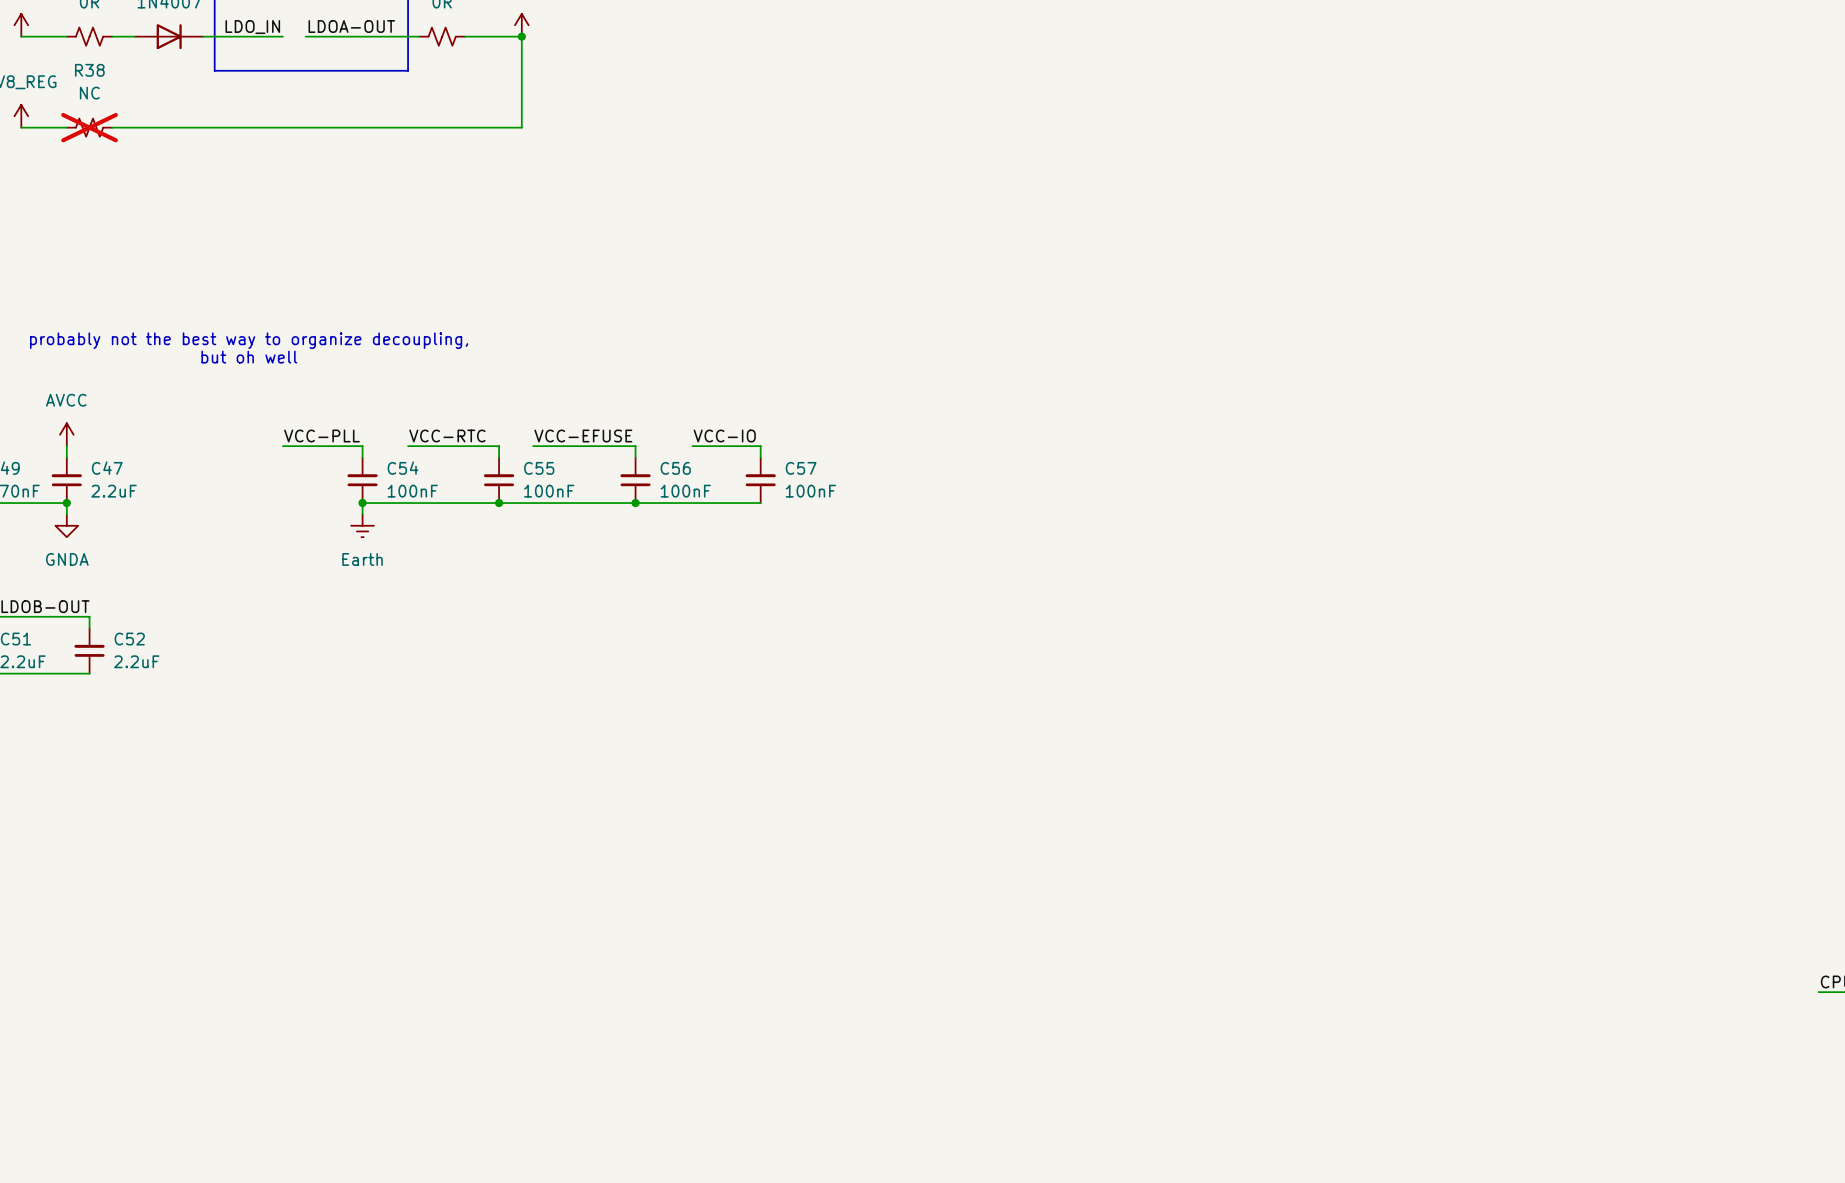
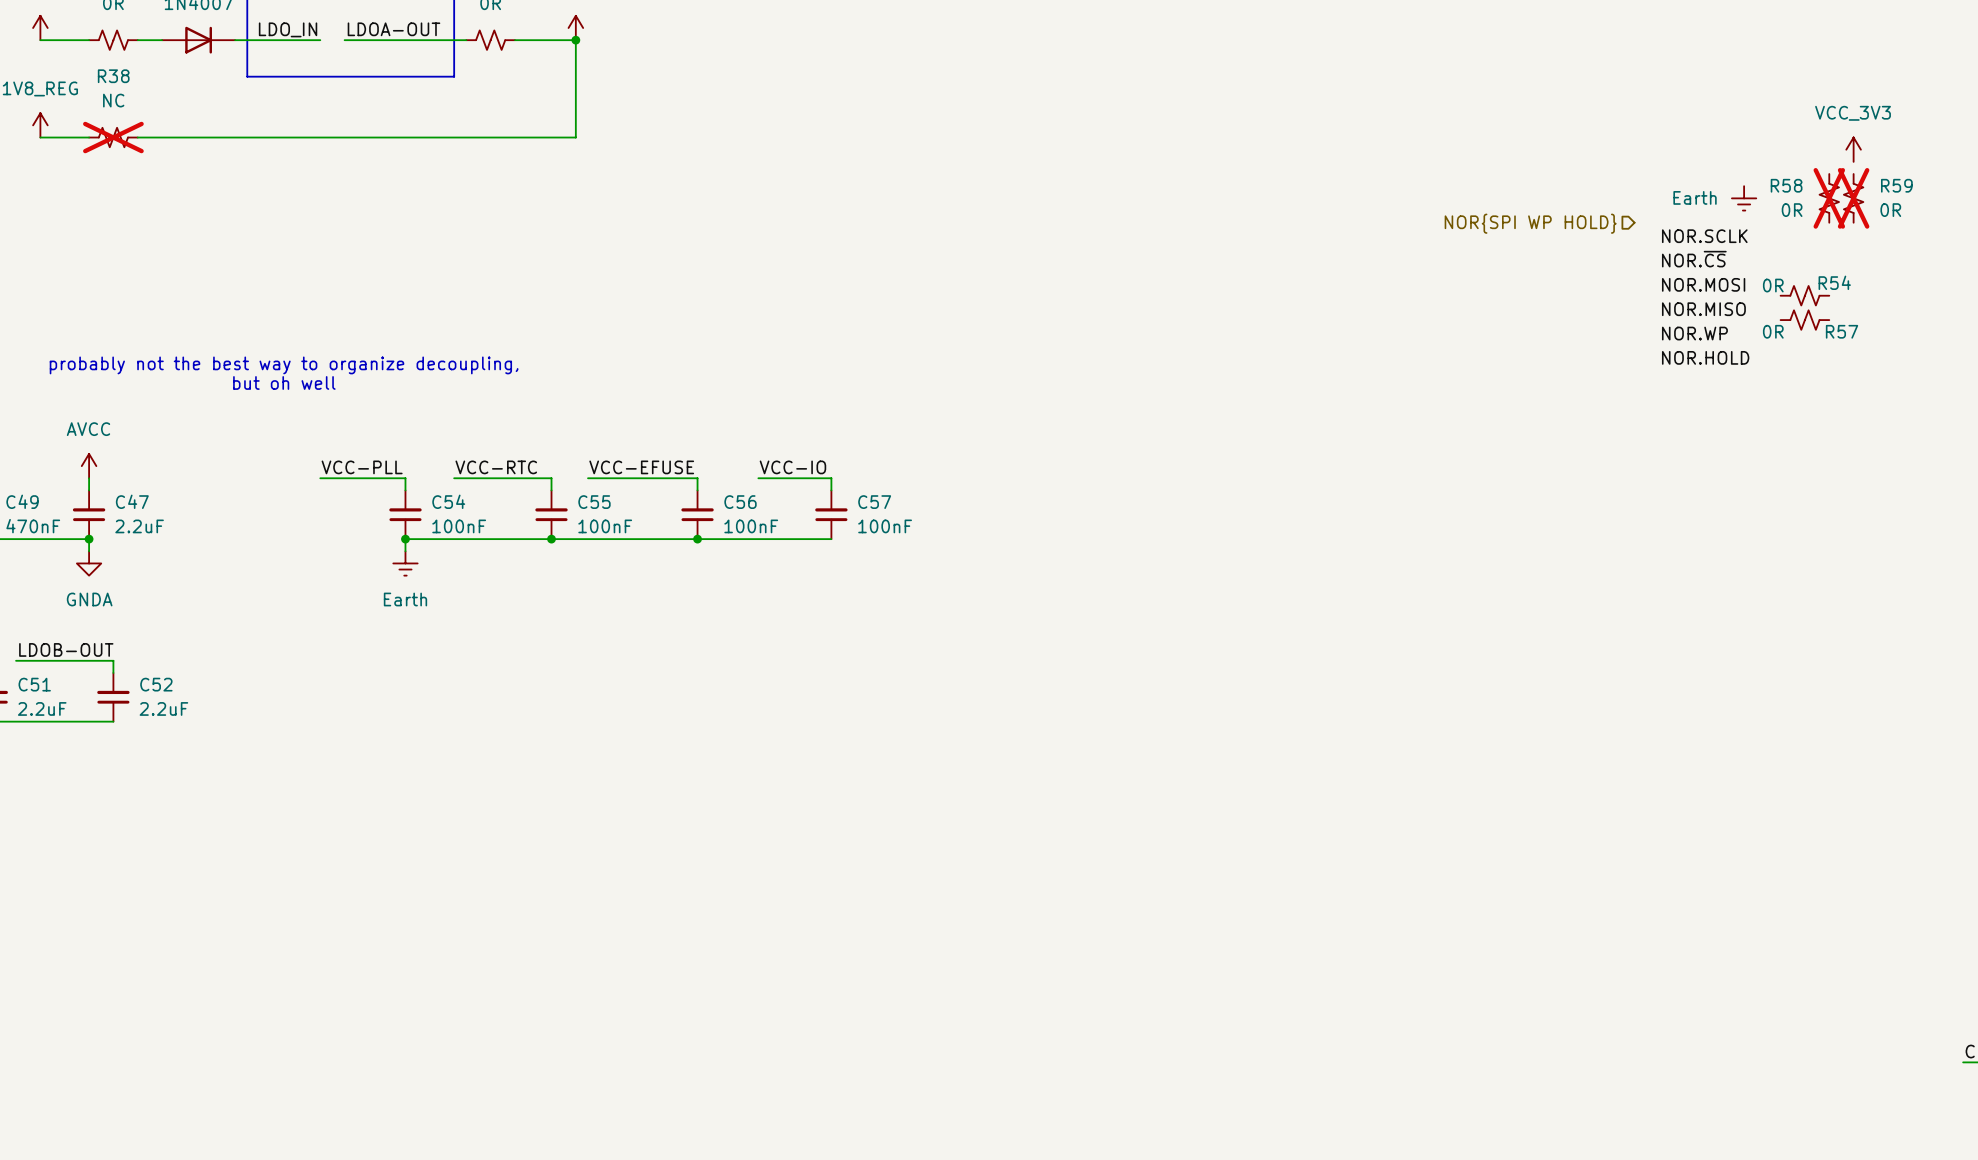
power symbol: none -> VCC_3V3 (1853, 149)
power symbol: none -> Earth (1744, 198)
R58: none -> 0R (1829, 198)
R59: none -> 0R (1853, 198)
hierarchical label: none -> NOR{SPI WP HOLD} (1530, 223)
label: none -> NOR.SCLK (1704, 236)
label: none -> NOR.~{CS} (1694, 259)
label: none -> NOR.MOSI (1703, 284)
R54: none -> 0R (1804, 295)
label: none -> NOR.MISO (1703, 309)
R57: none -> 0R (1804, 320)
label: none -> NOR.WP (1694, 333)
label: none -> NOR.HOLD (1705, 357)

